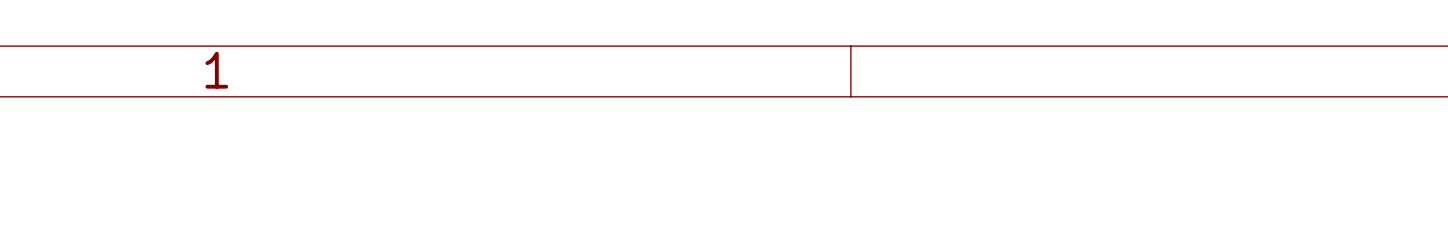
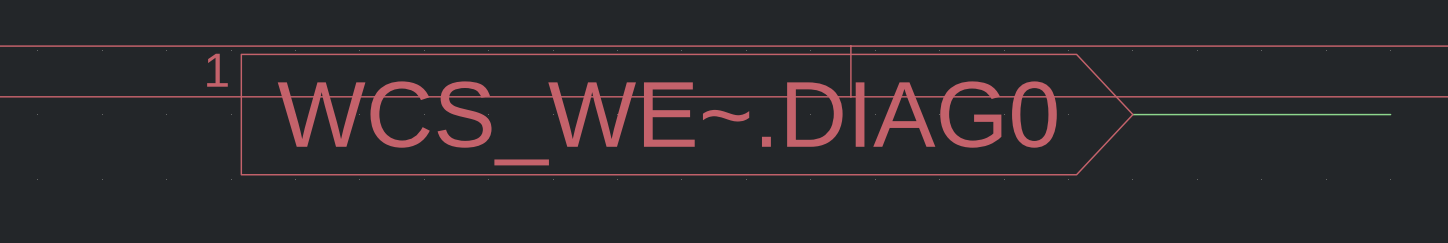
wire: none -> (1132, 114) (1390, 114)
global label: none -> WCS_WE~.DIAG0 (667, 123)

